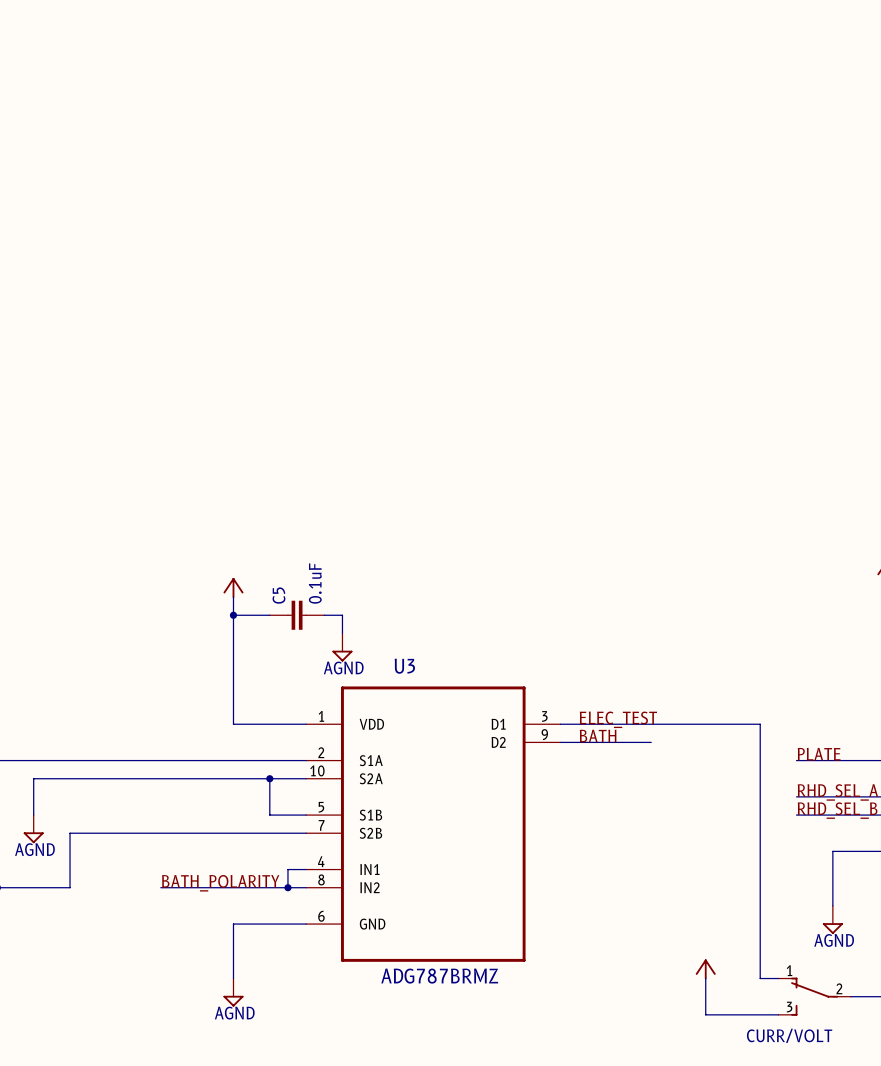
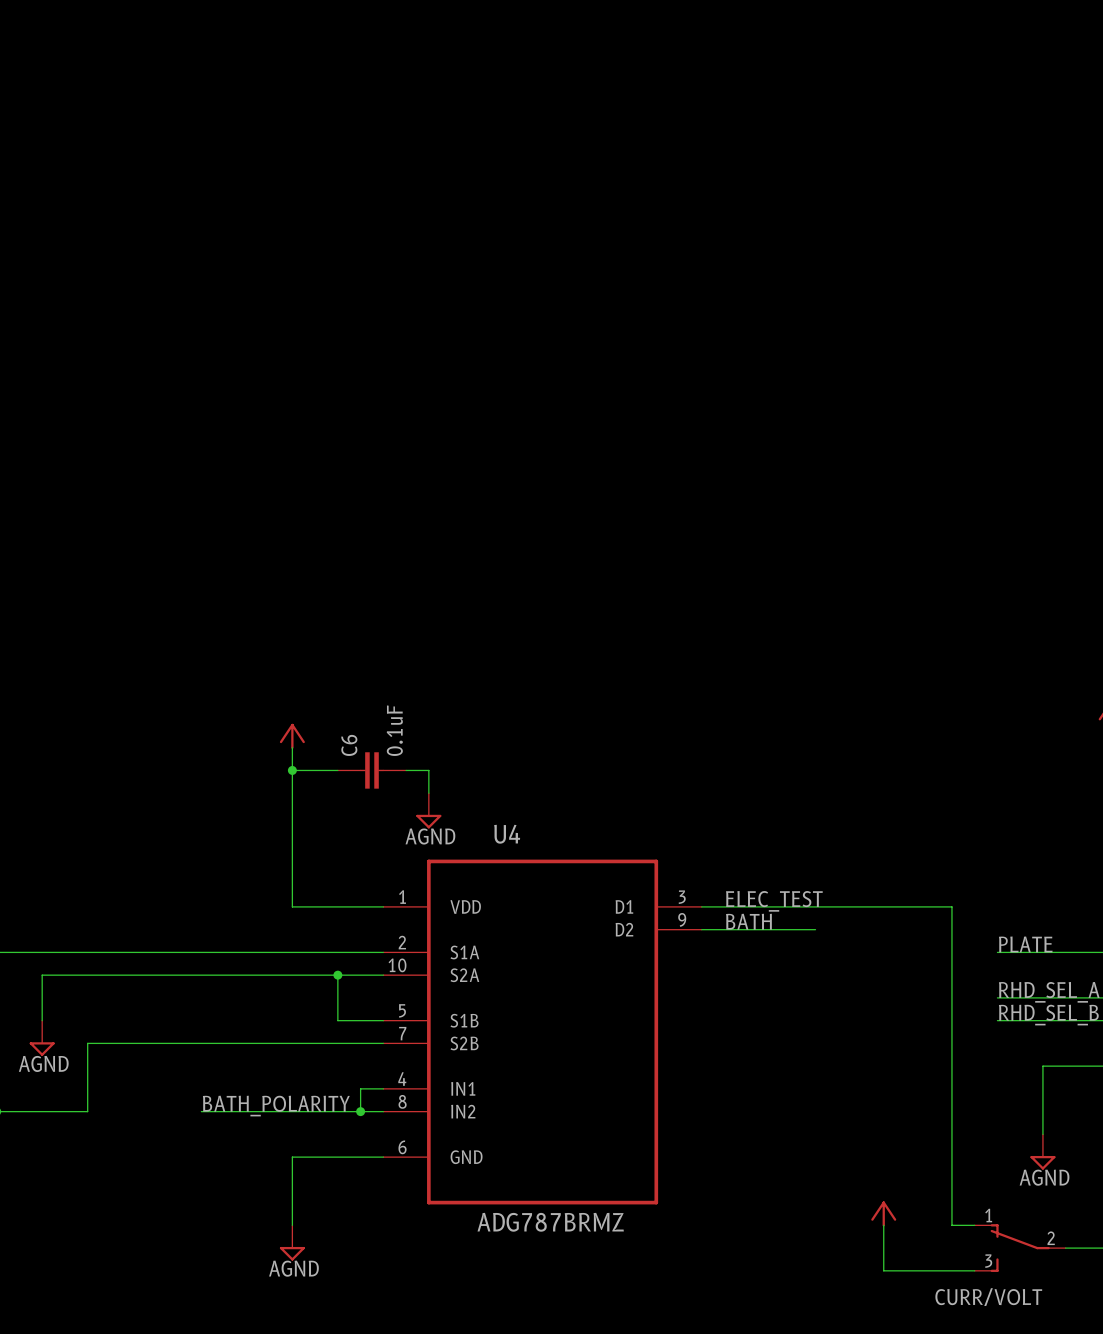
C5 name: C5 (278, 595) -> C6 (349, 745)
U3 name: U3 (404, 666) -> U4 (507, 834)

